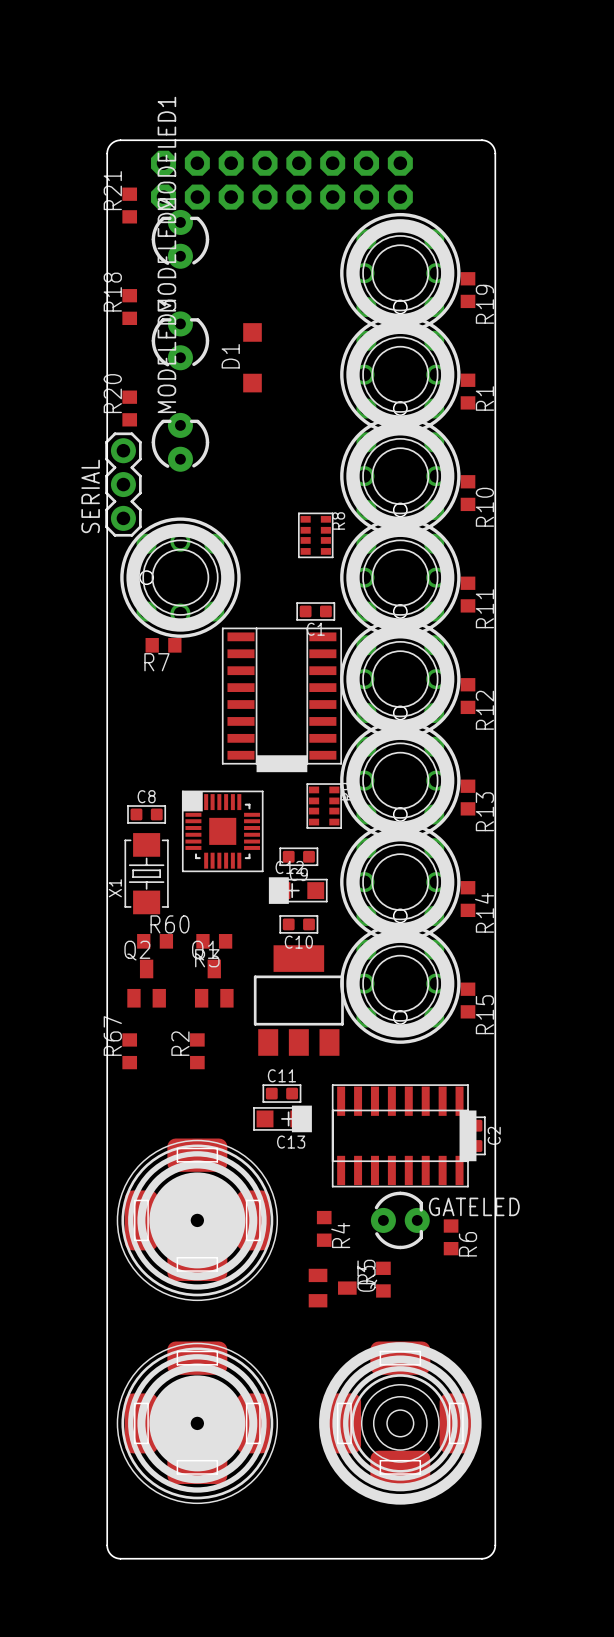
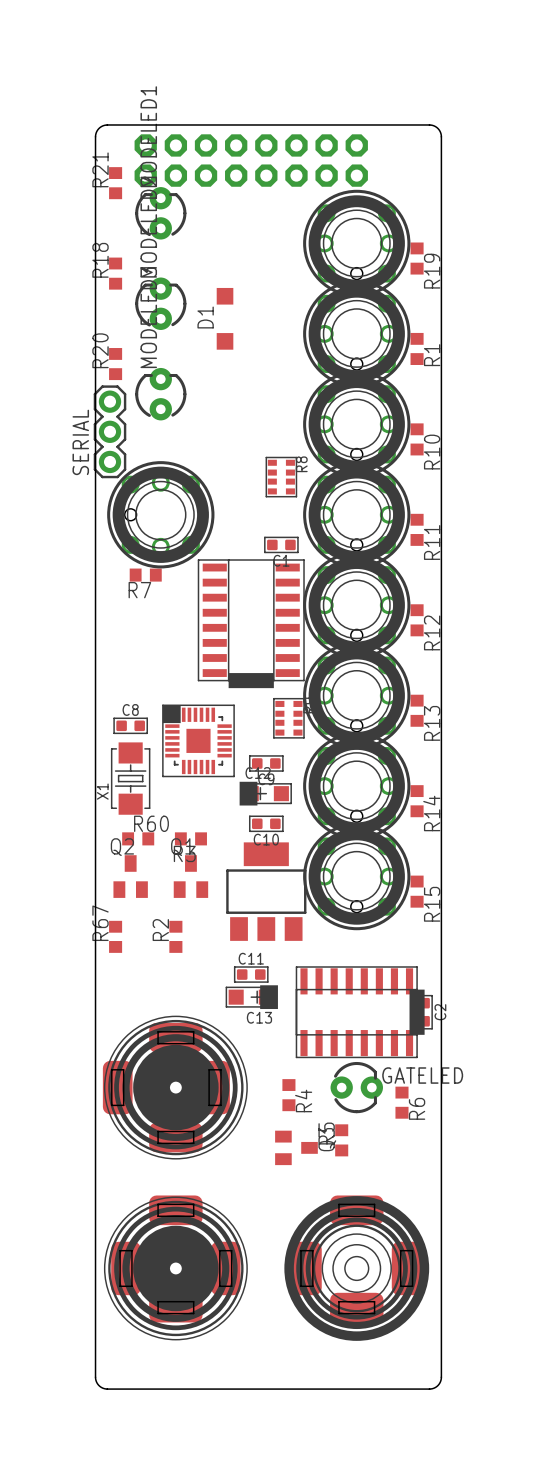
part rotation: 0° (197, 1219) -> 90° counterclockwise (175, 1087)

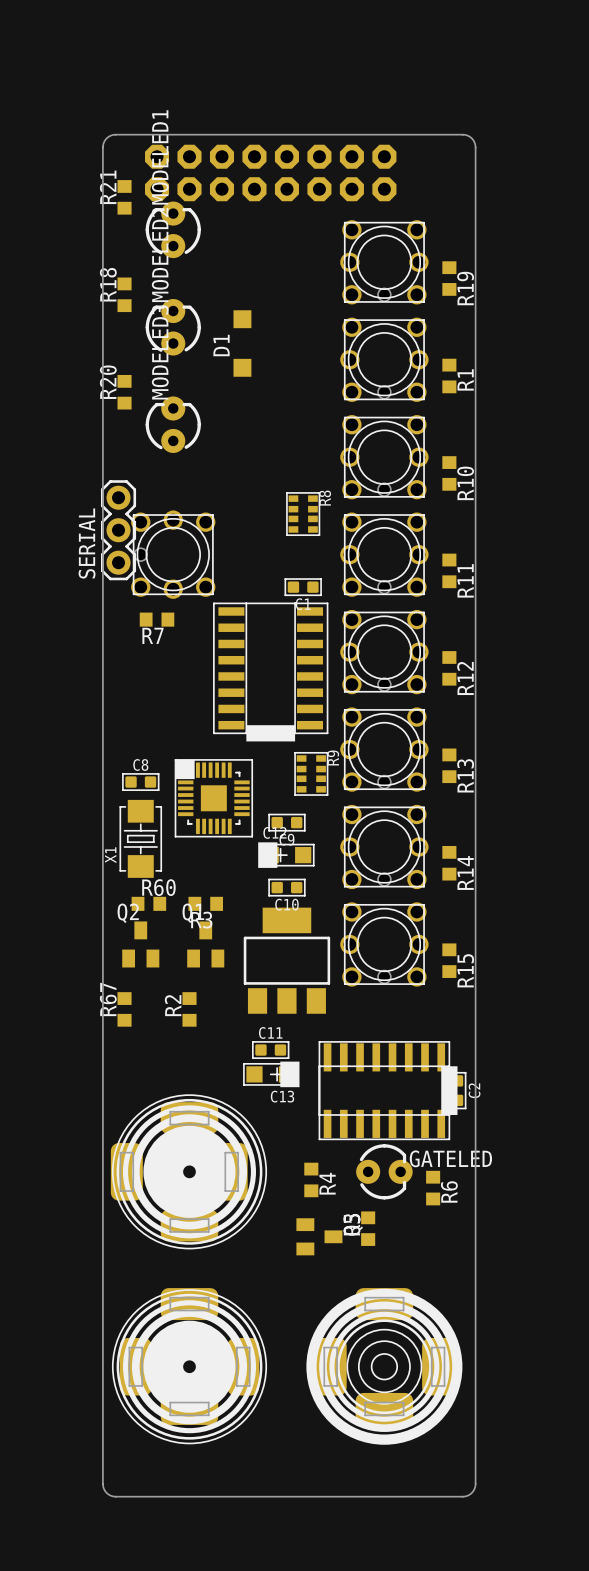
part footprint: [303, 189, 411, 298] -> [340, 220, 429, 305]
part footprint: [303, 280, 411, 388] -> [340, 317, 429, 402]
part footprint: [303, 370, 411, 479] -> [340, 415, 429, 500]
SERIAL position: (110, 431) -> (118, 530)
part footprint: [107, 461, 215, 569] -> [131, 510, 216, 599]
part footprint: [303, 461, 411, 569] -> [340, 512, 429, 597]
part footprint: [303, 551, 411, 659] -> [340, 609, 429, 695]
part footprint: [303, 642, 411, 750] -> [340, 707, 429, 792]
part footprint: [303, 732, 411, 840] -> [340, 804, 429, 890]
part footprint: [303, 822, 411, 931] -> [340, 902, 429, 987]

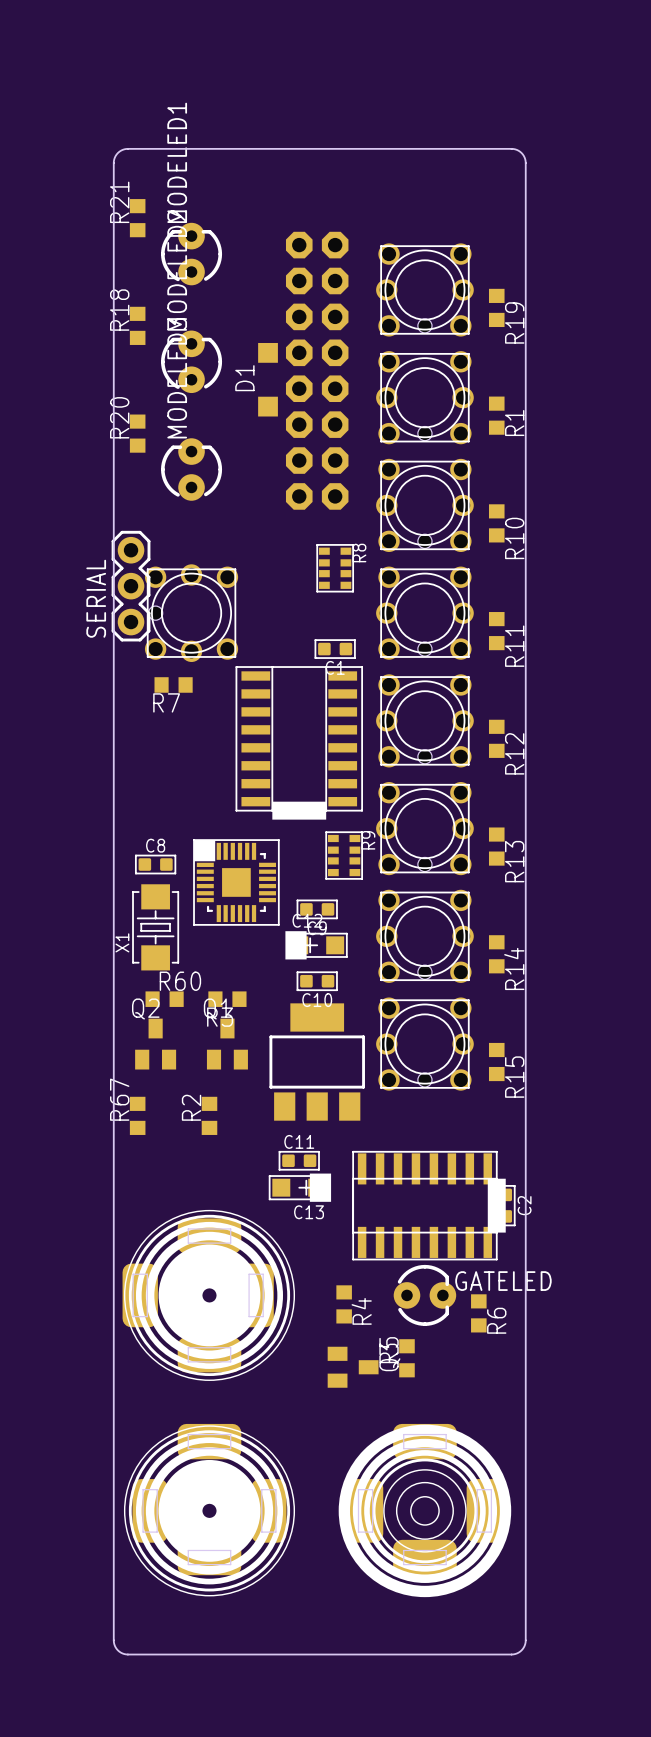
part rotation: 0° (270, 172) -> 90° clockwise (317, 370)
part position: (270, 172) -> (317, 370)

